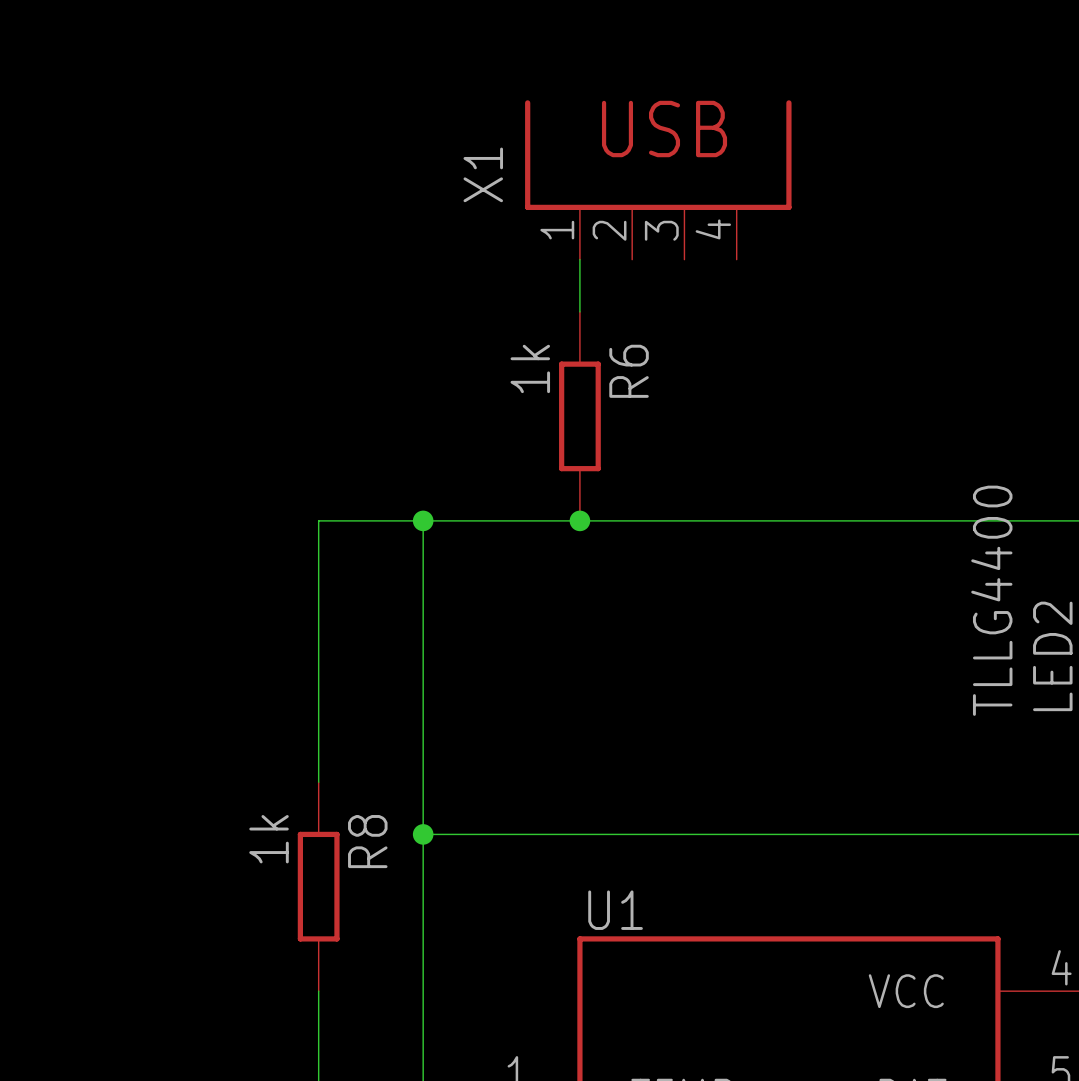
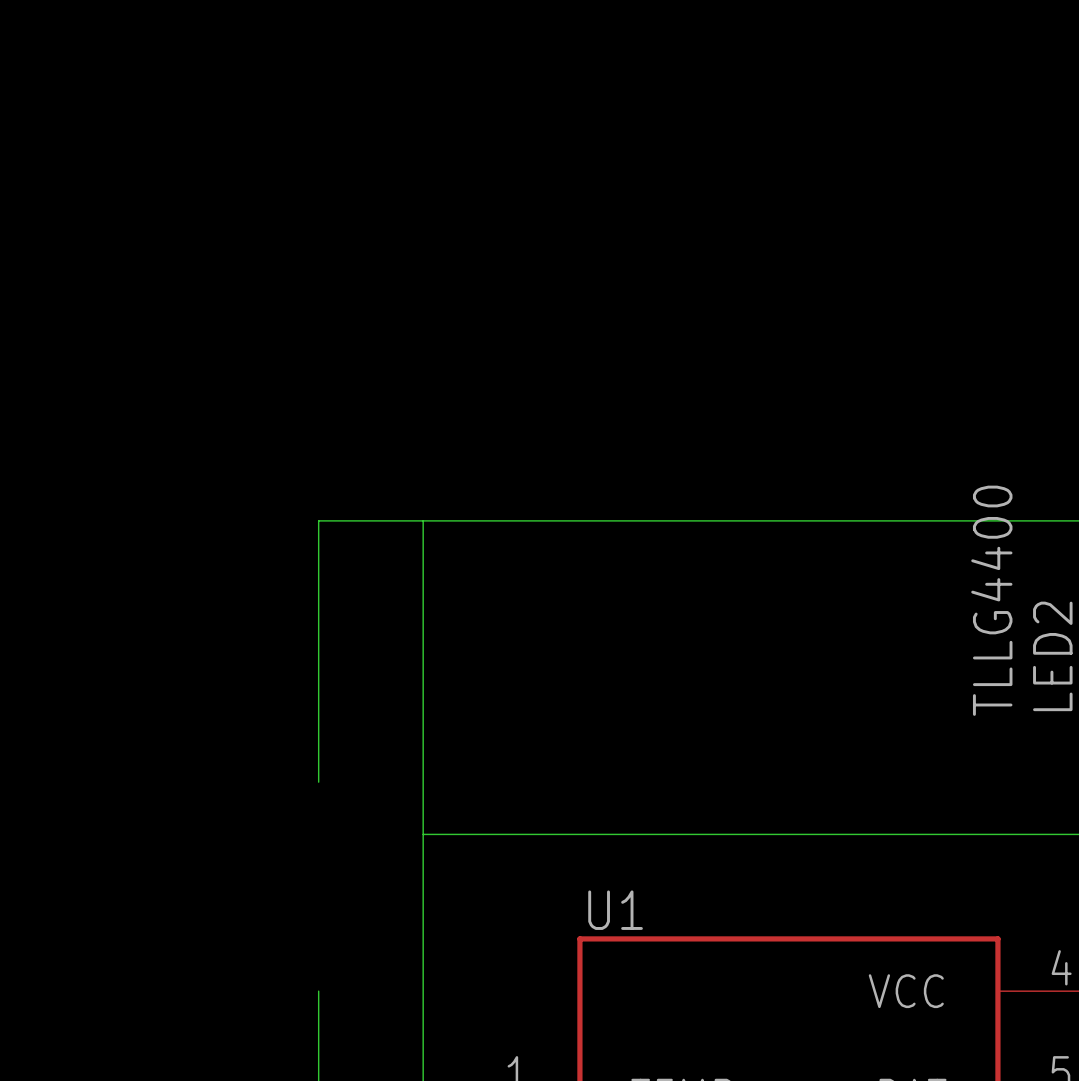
X1: (658, 179) -> none
wire: (579, 259) (579, 311) -> none
R6: 1k (579, 416) -> none
junction: (423, 520) -> none
junction: (579, 520) -> none
junction: (423, 834) -> none
R8: 1k (318, 886) -> none

